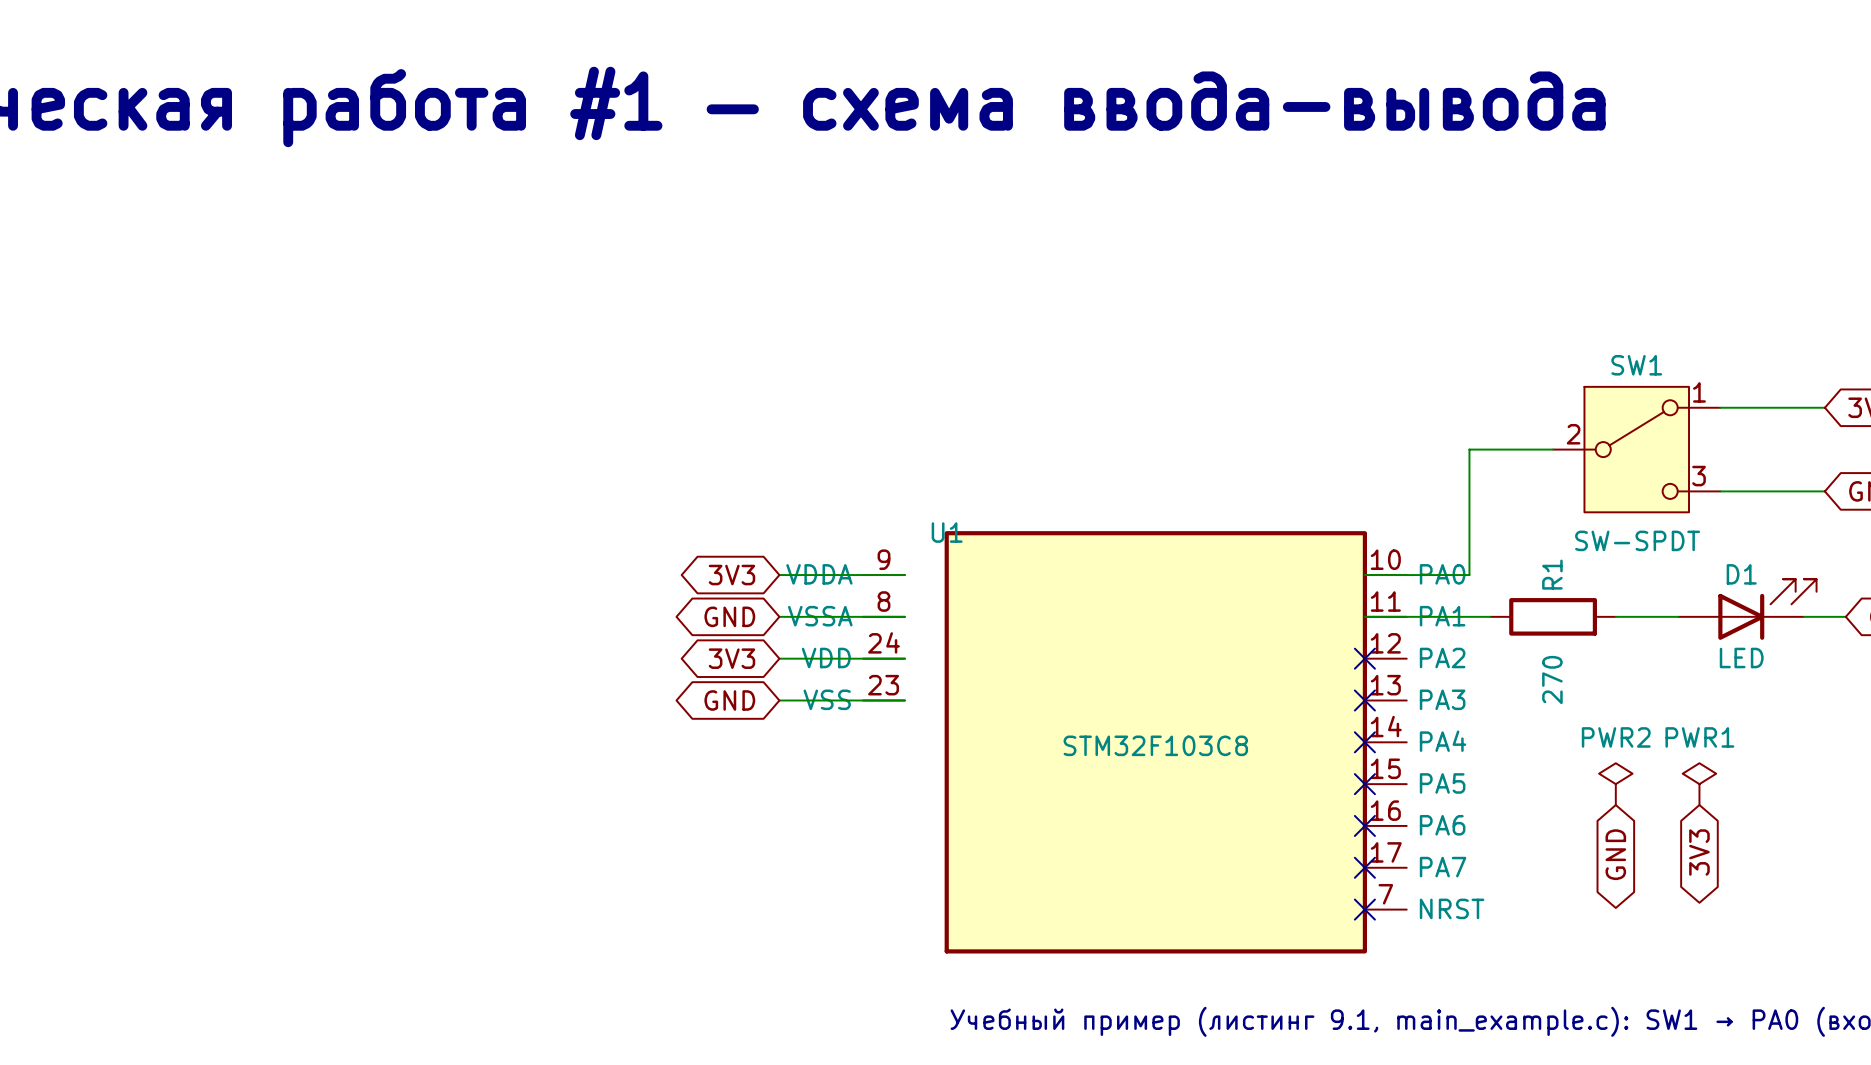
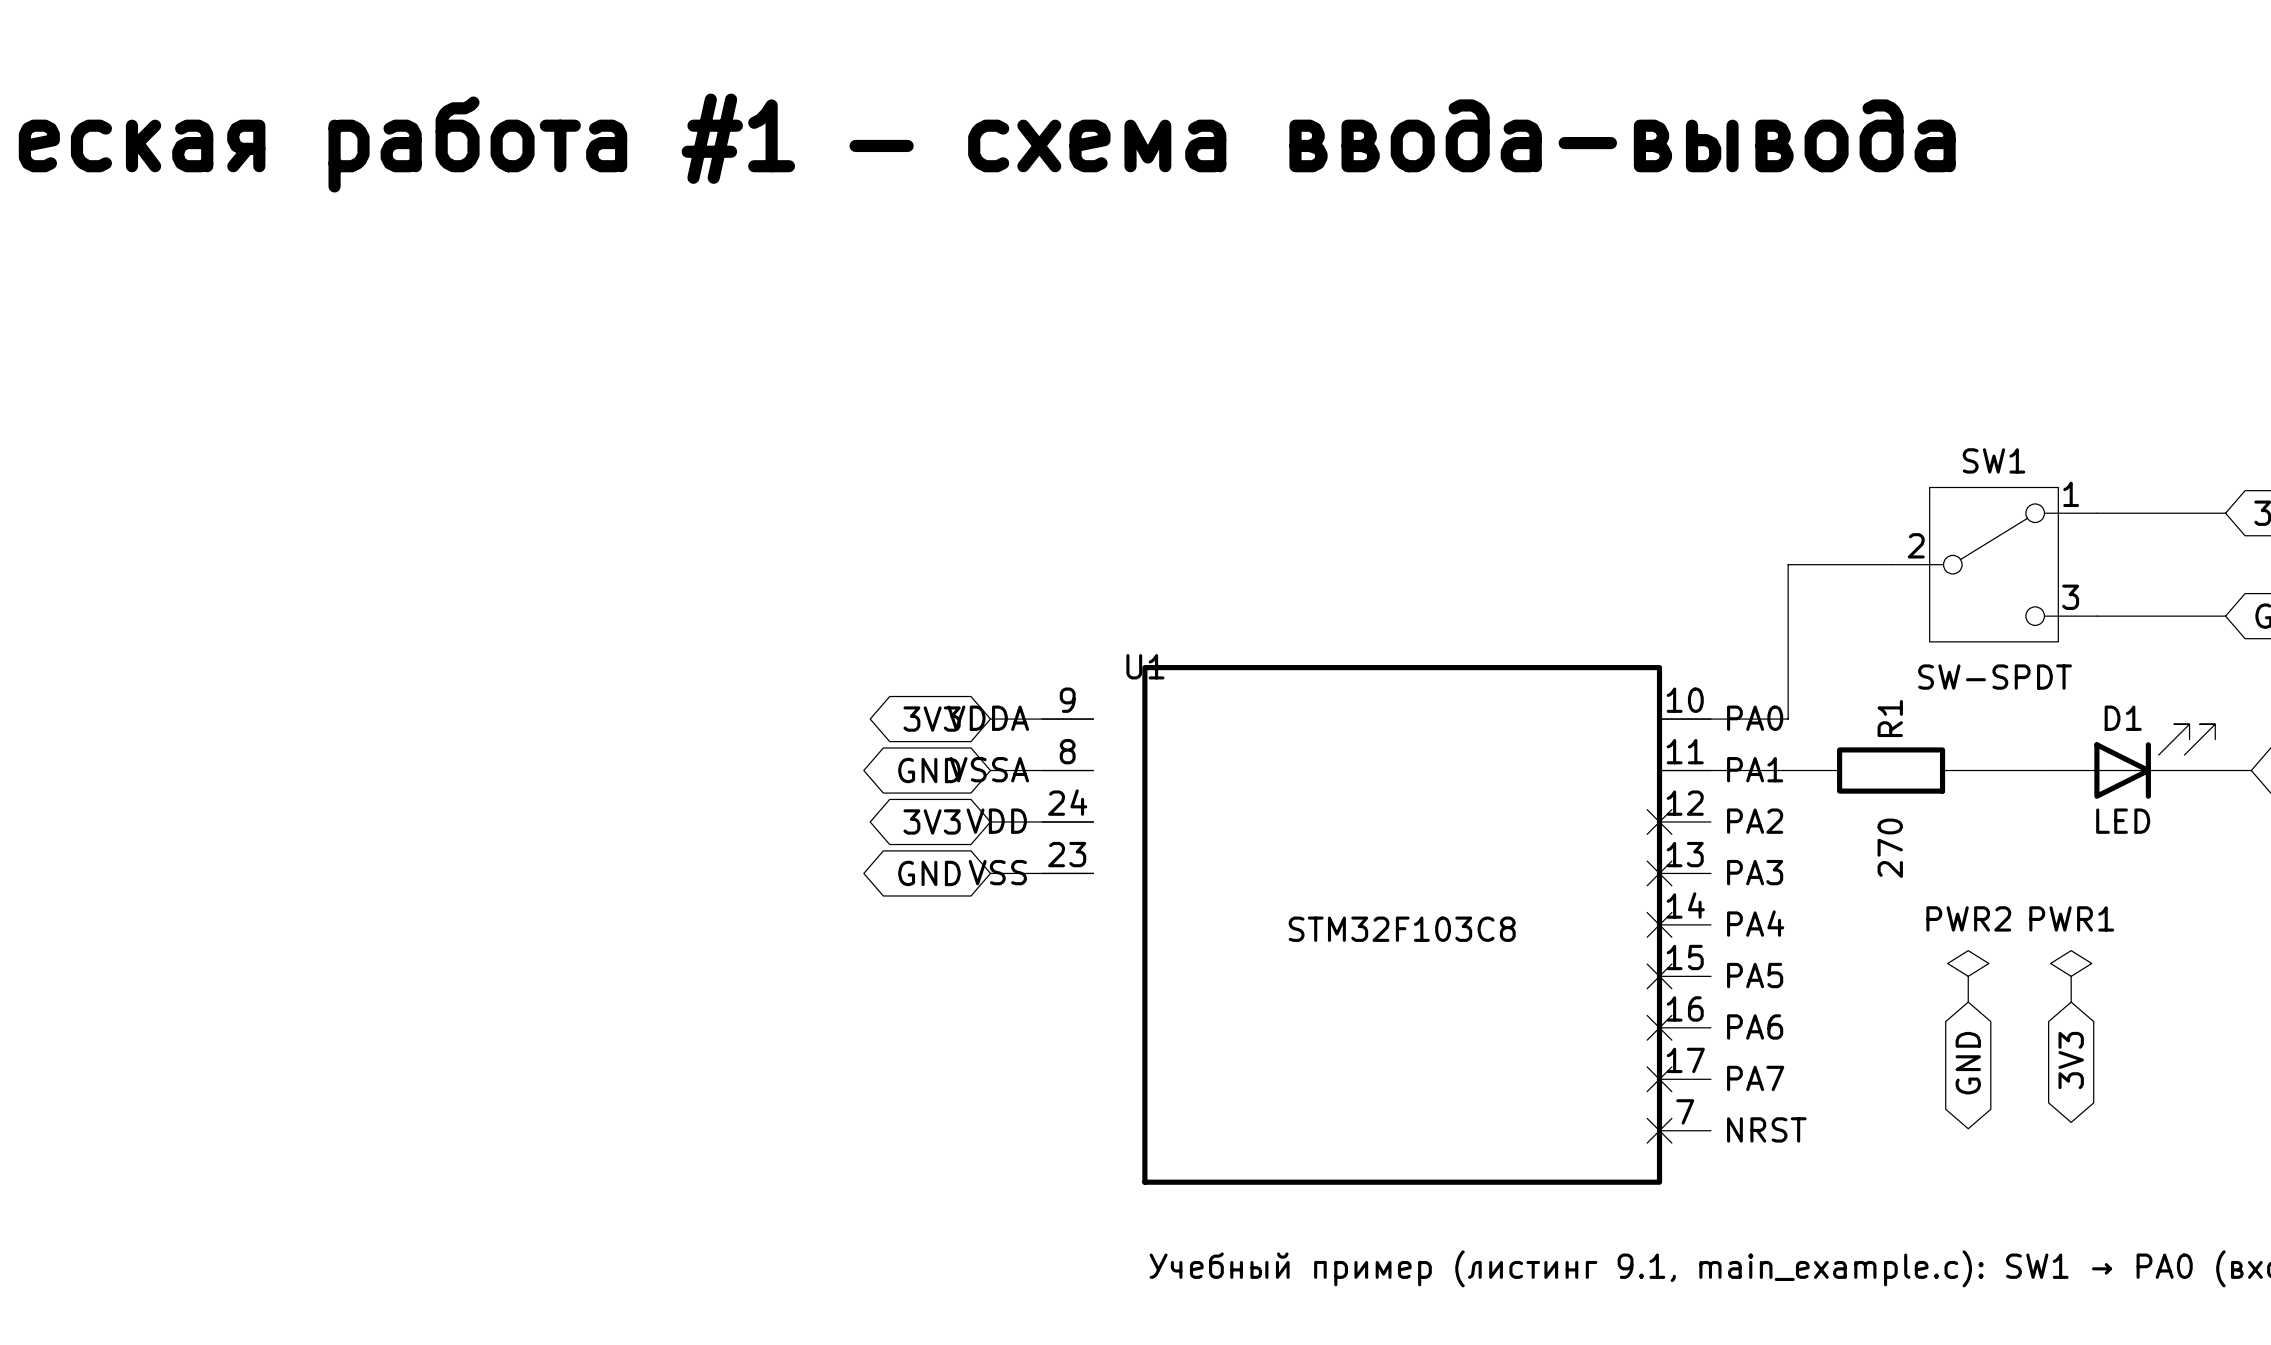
global label position: 3V3 (731, 575) -> 3V3 (932, 719)
wire: (779, 575) (821, 575) -> none
global label position: GND (729, 616) -> GND (929, 770)
wire: (779, 616) (821, 616) -> none
global label position: 3V3 (731, 658) -> 3V3 (932, 821)
wire: (779, 658) (821, 658) -> none
global label position: GND (729, 700) -> GND (929, 873)
wire: (779, 700) (821, 700) -> none

